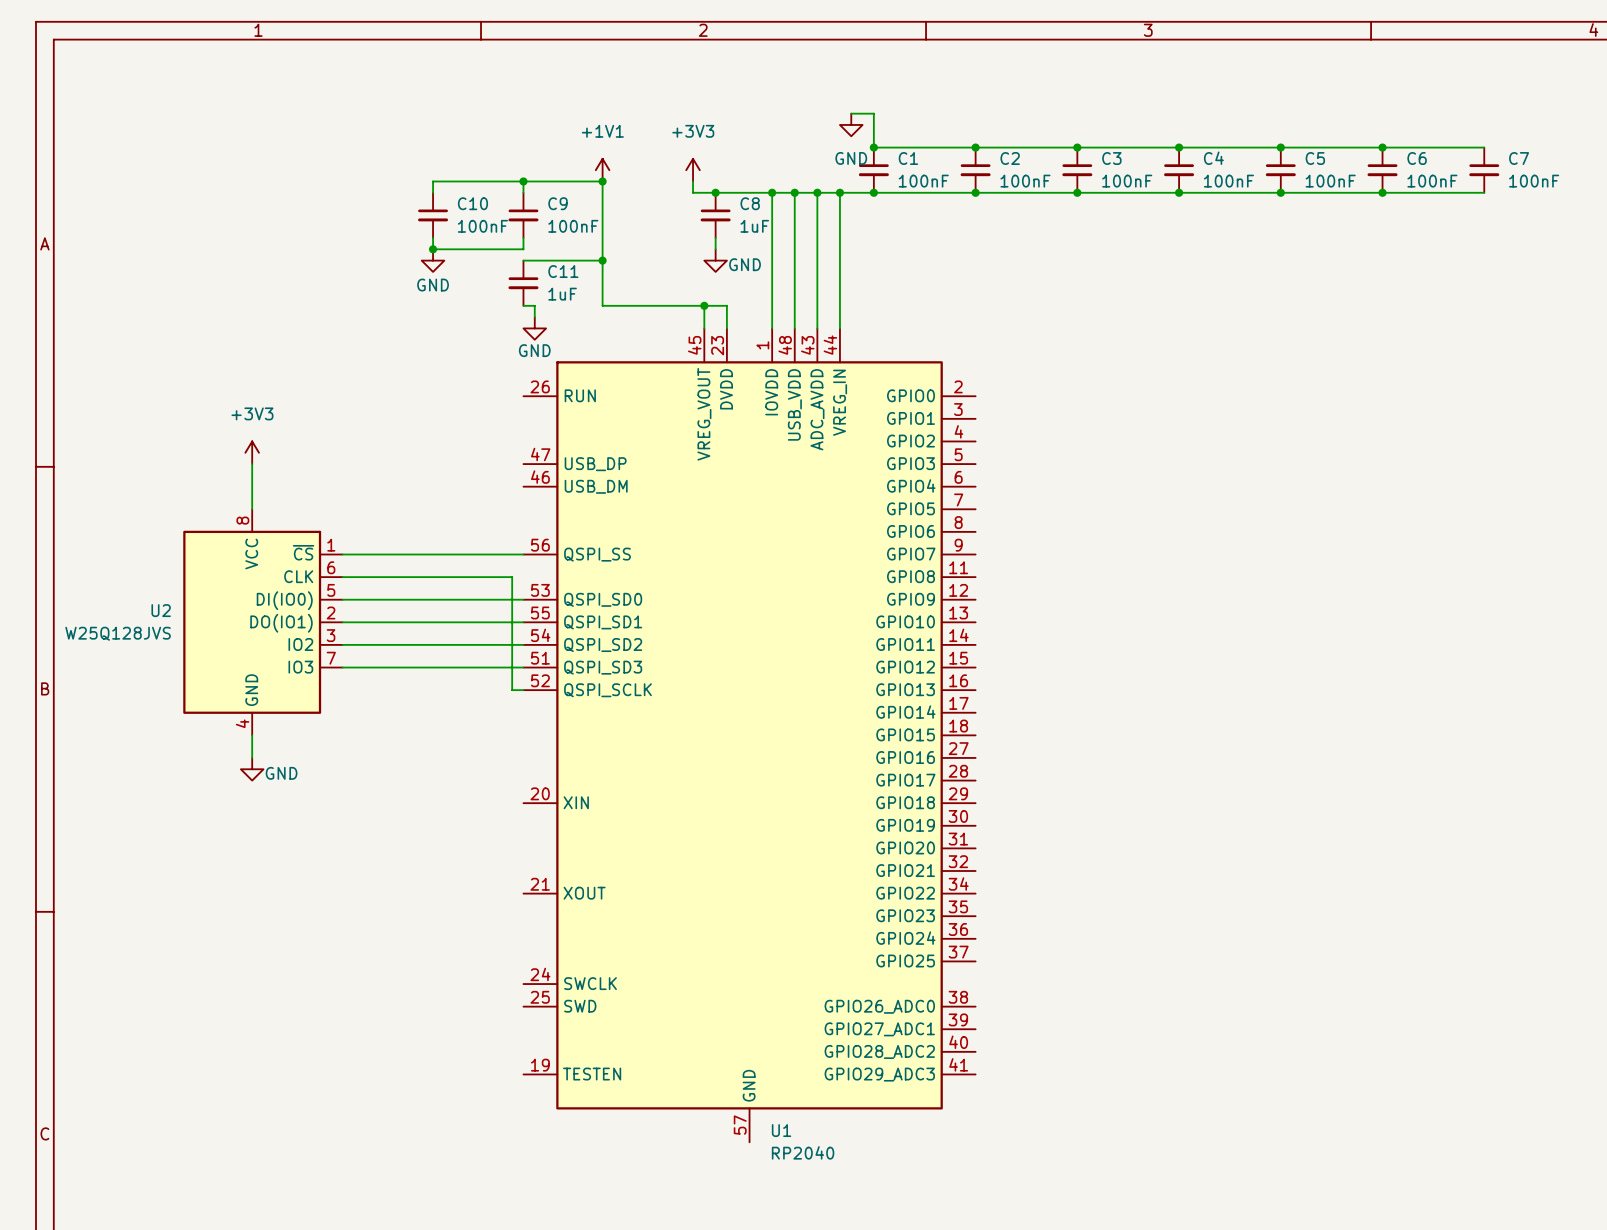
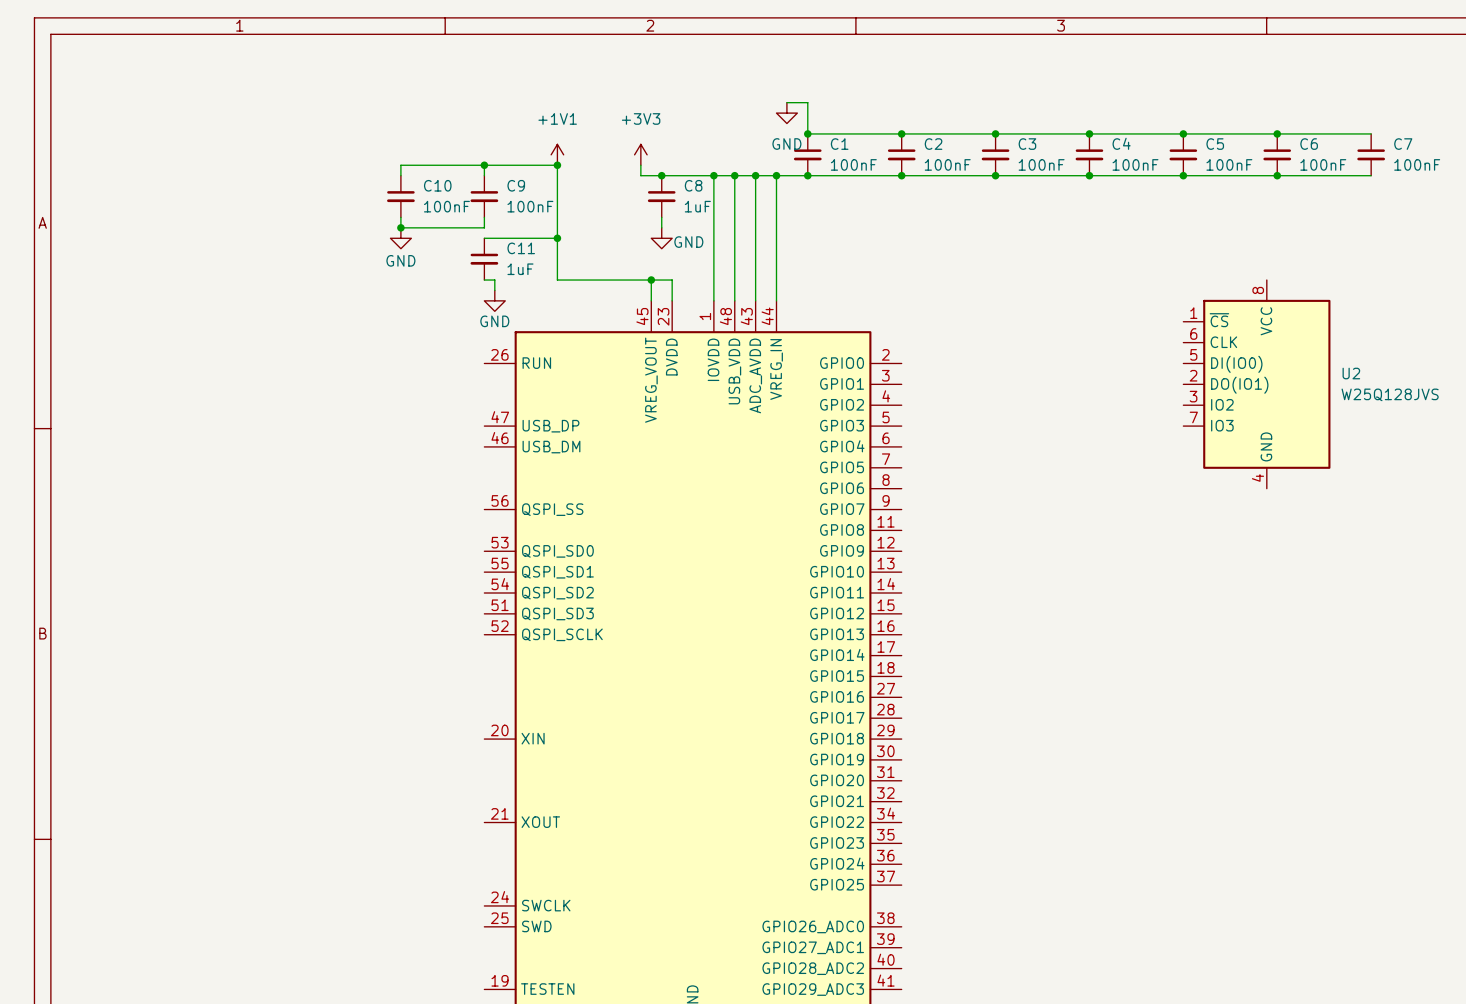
power symbol: +3V3 (252, 452) -> none
wire: (252, 464) (252, 509) -> none
wire: (342, 554) (523, 554) -> none
wire: (342, 577) (512, 577) (512, 690) (523, 690) -> none
wire: (342, 599) (523, 599) -> none
U2 flip: as is (252, 622) -> left-right (1266, 384)
U2 position: (262, 622) -> (1256, 384)
wire: (342, 622) (523, 622) -> none
wire: (342, 644) (523, 644) -> none
wire: (342, 667) (523, 667) -> none
wire: (252, 735) (252, 757) -> none
power symbol: GND (252, 769) -> none

